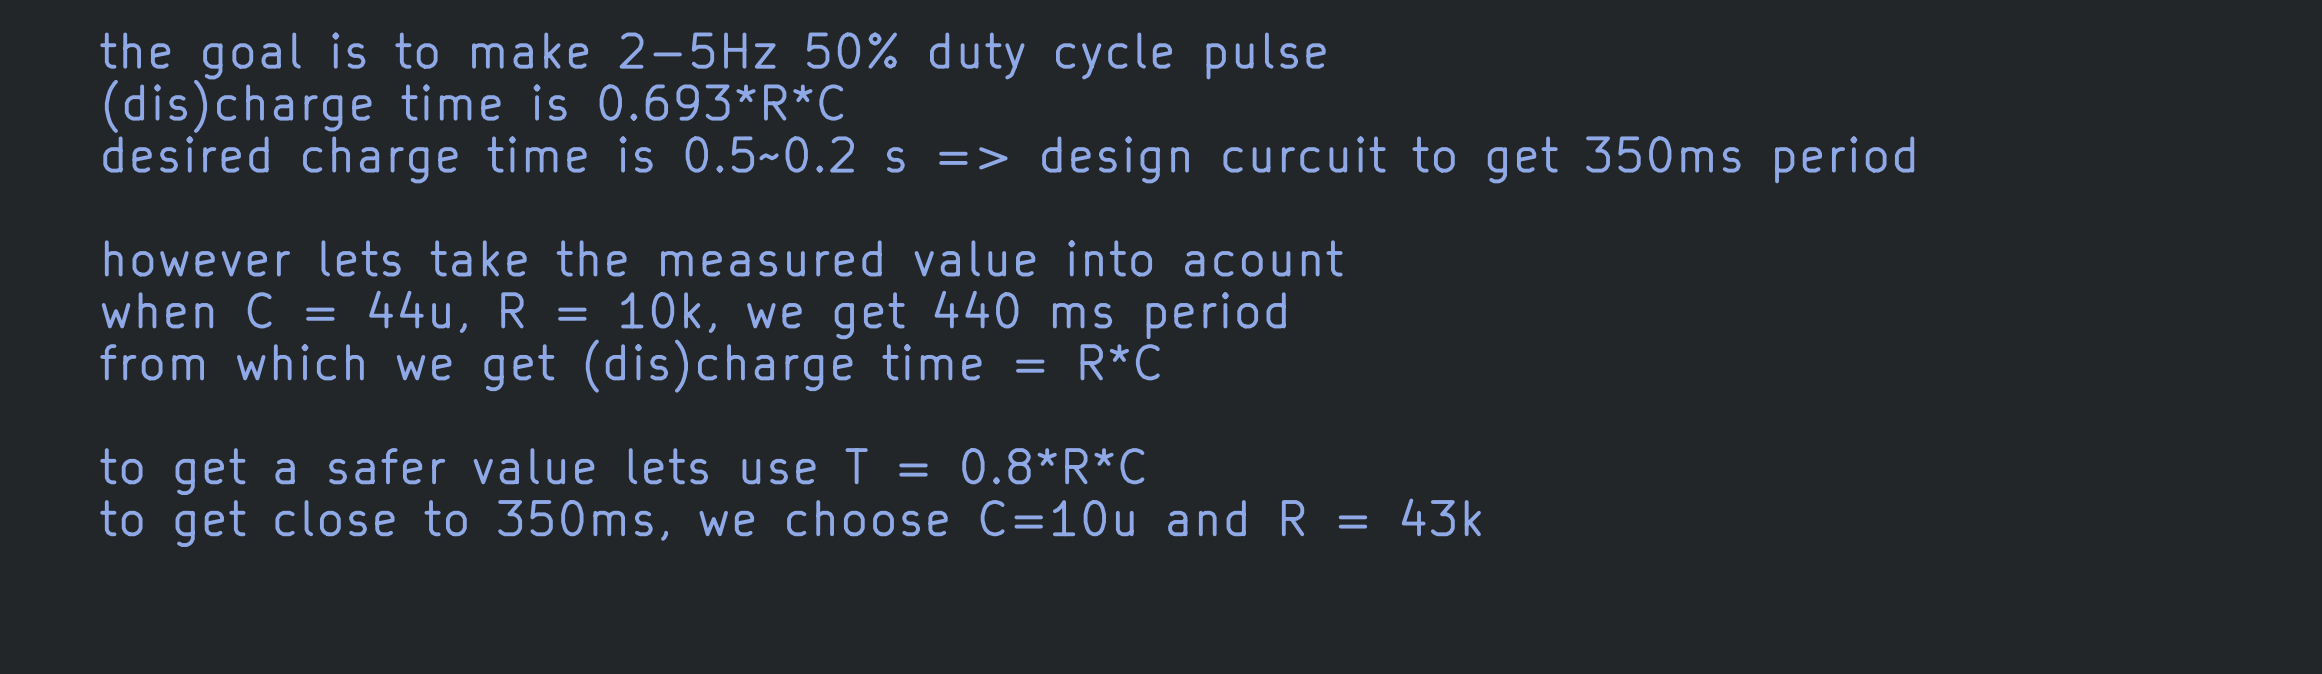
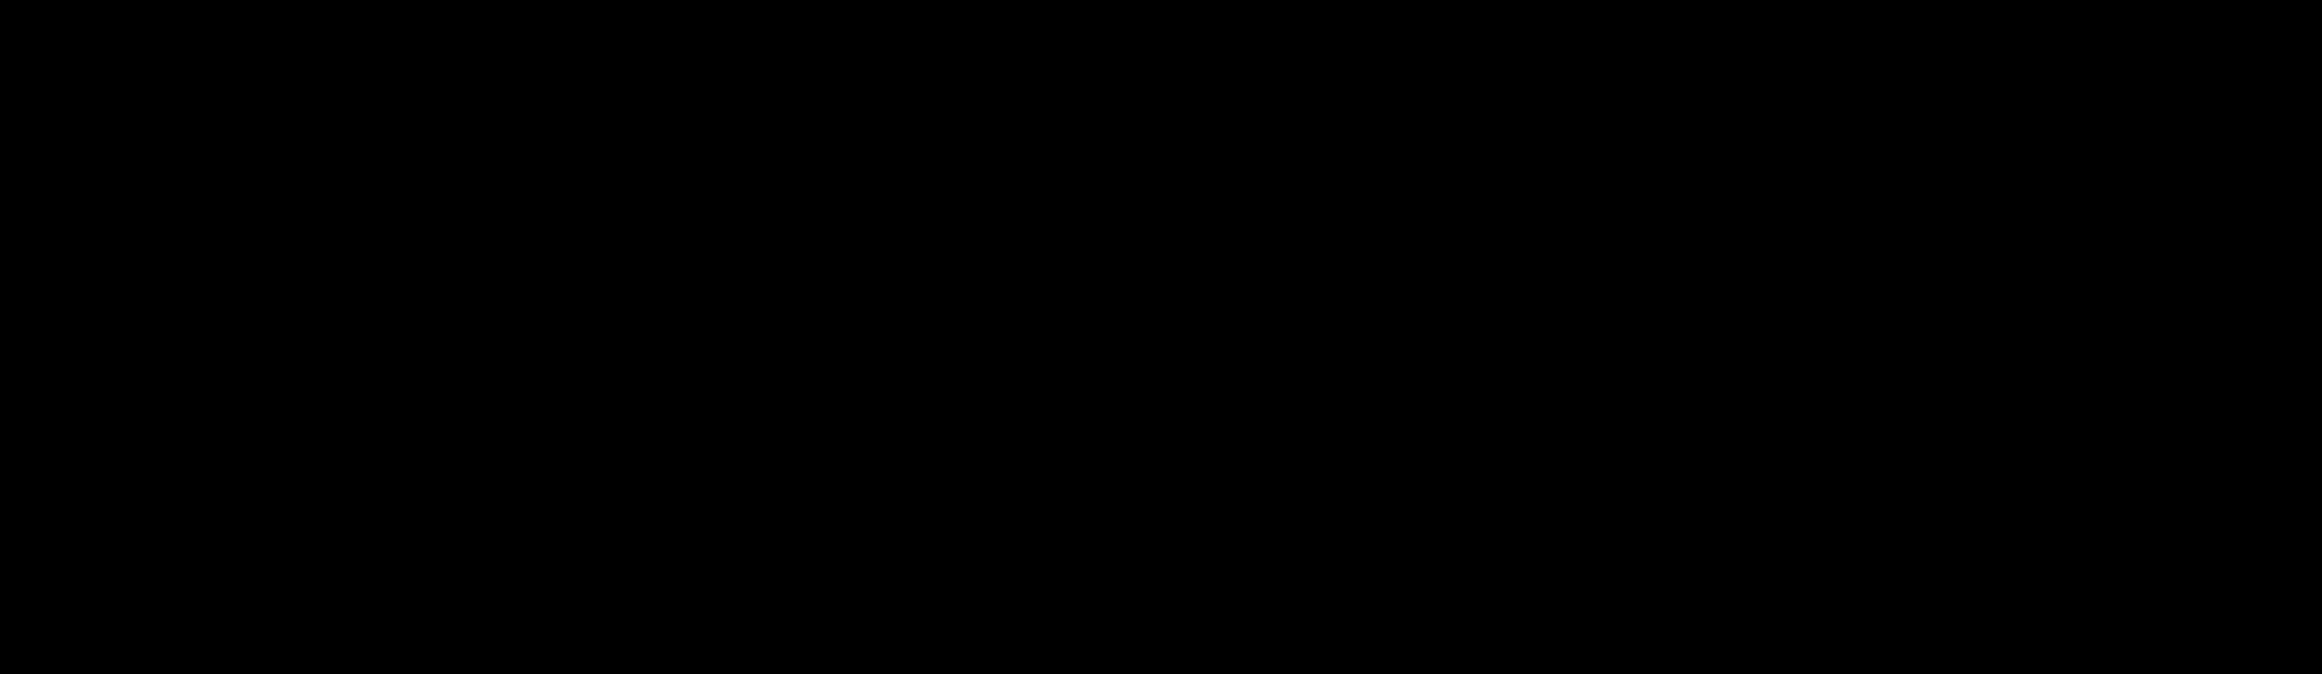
text: the goal is to make 2-5Hz 50% duty cycle pulse (712, 55) -> none
text: (dis)charge time is 0.693*R*C (474, 106) -> none
text: desired charge time is 0.5~0.2 s => design curcuit to get 350ms period (1008, 159) -> none
text: however lets take the measured value into acount (723, 258) -> none
text: when C = 44u, R = 10k, we get 440 ms period (693, 314) -> none
text: from which we get (dis)charge time = R*C (629, 366) -> none
text: to get a safer value lets use T = 0.8*R*C (622, 471) -> none
text: to get close to 350ms, we choose C=10u and R = 43k (790, 522) -> none

